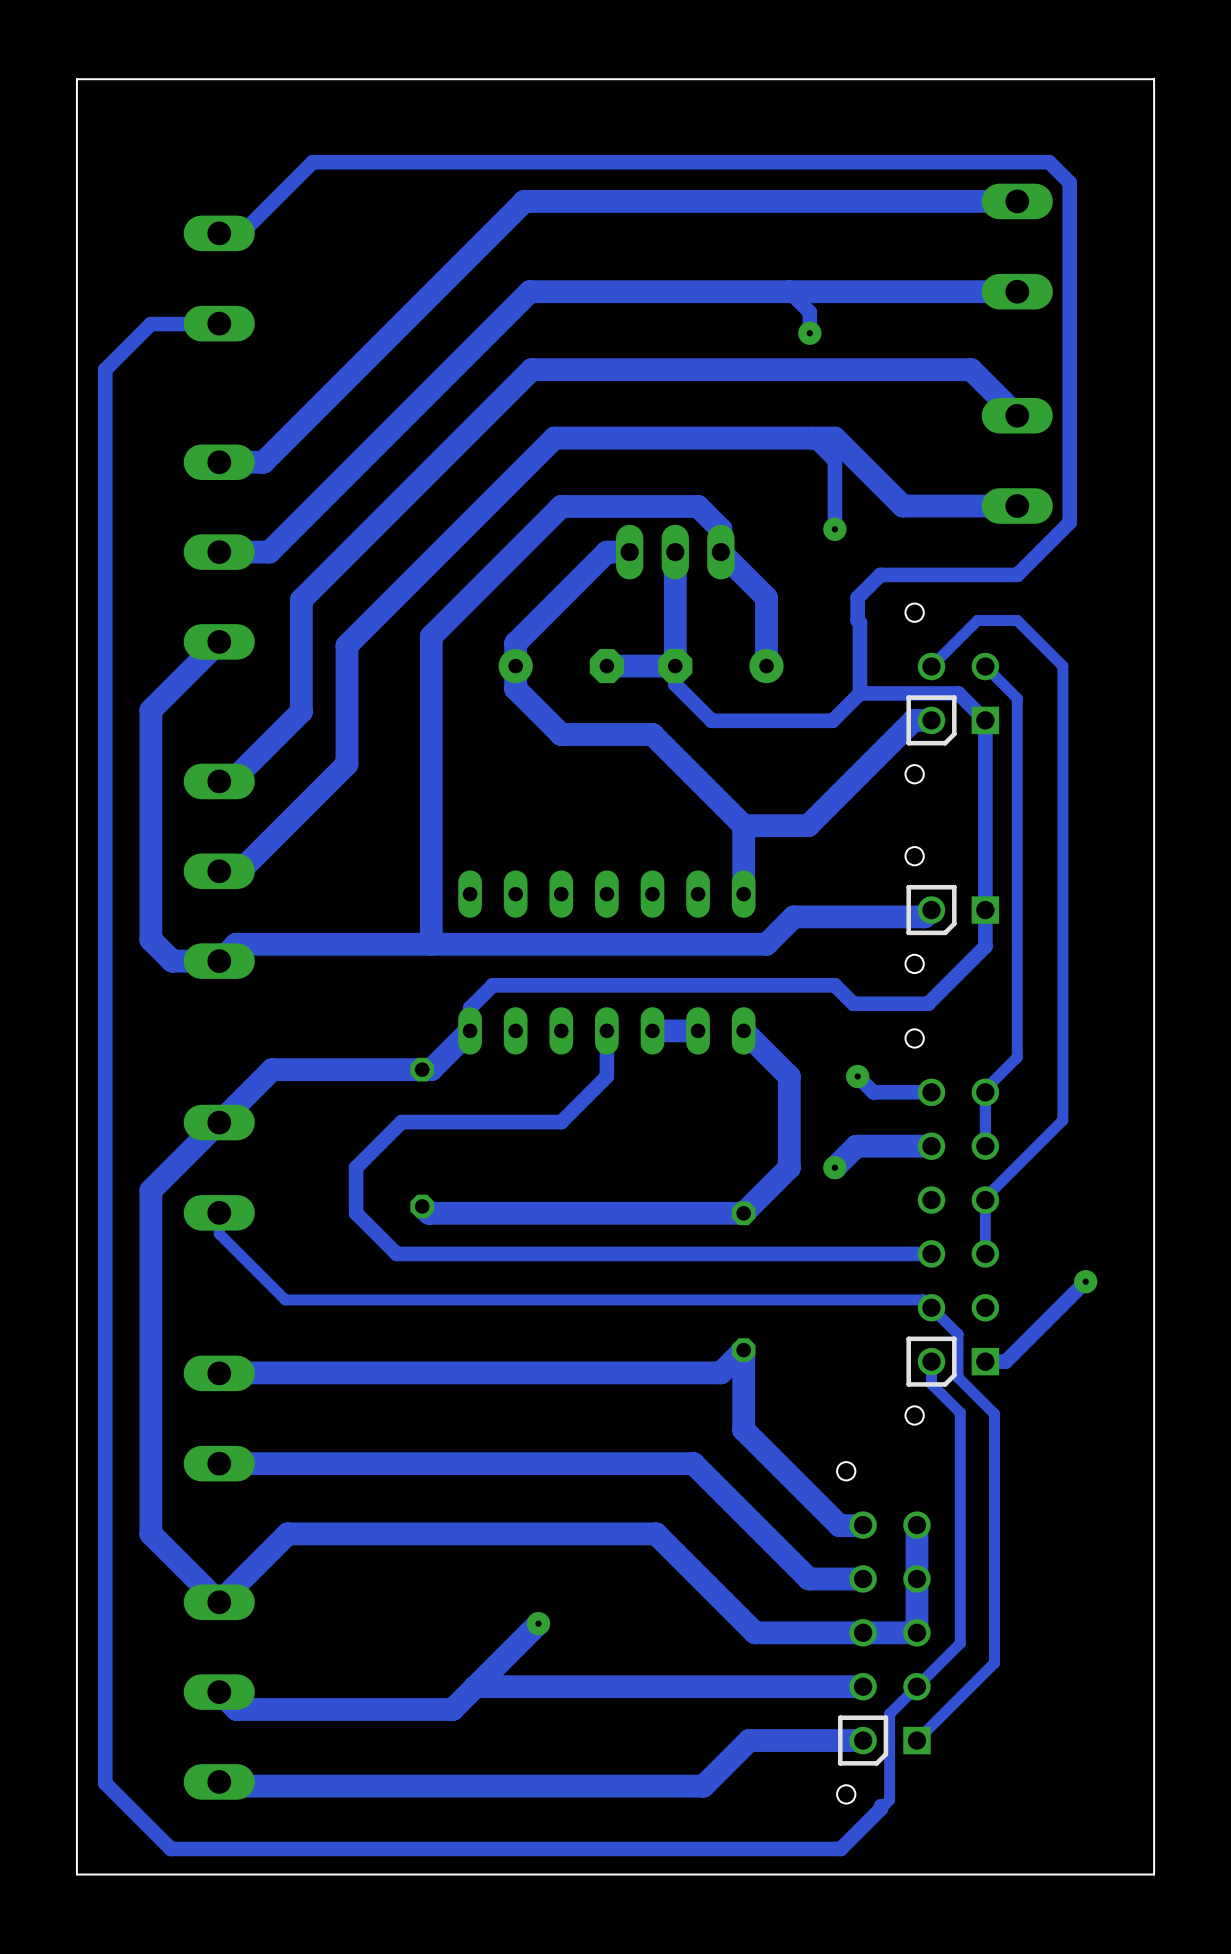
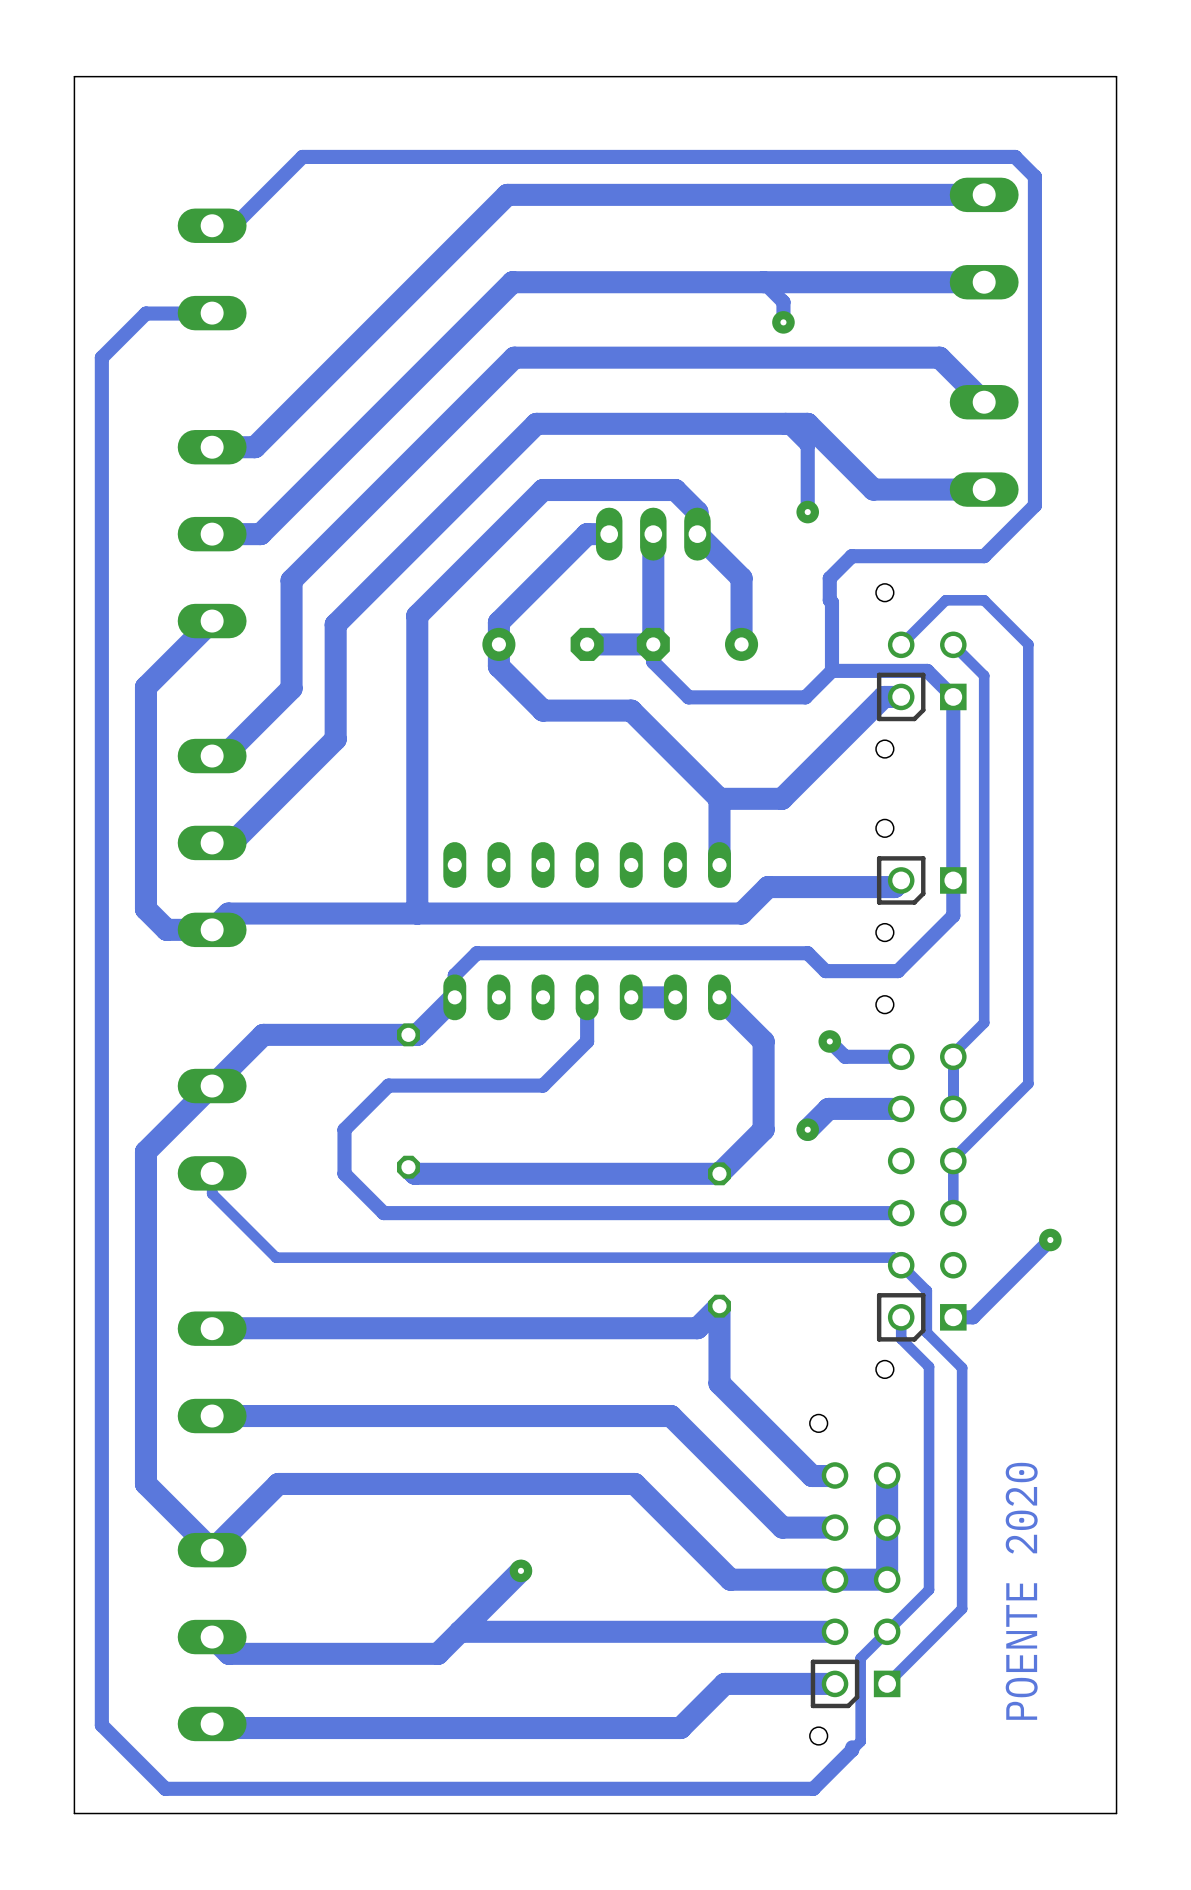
text: none -> POENTE 2020 (1021, 1591)

